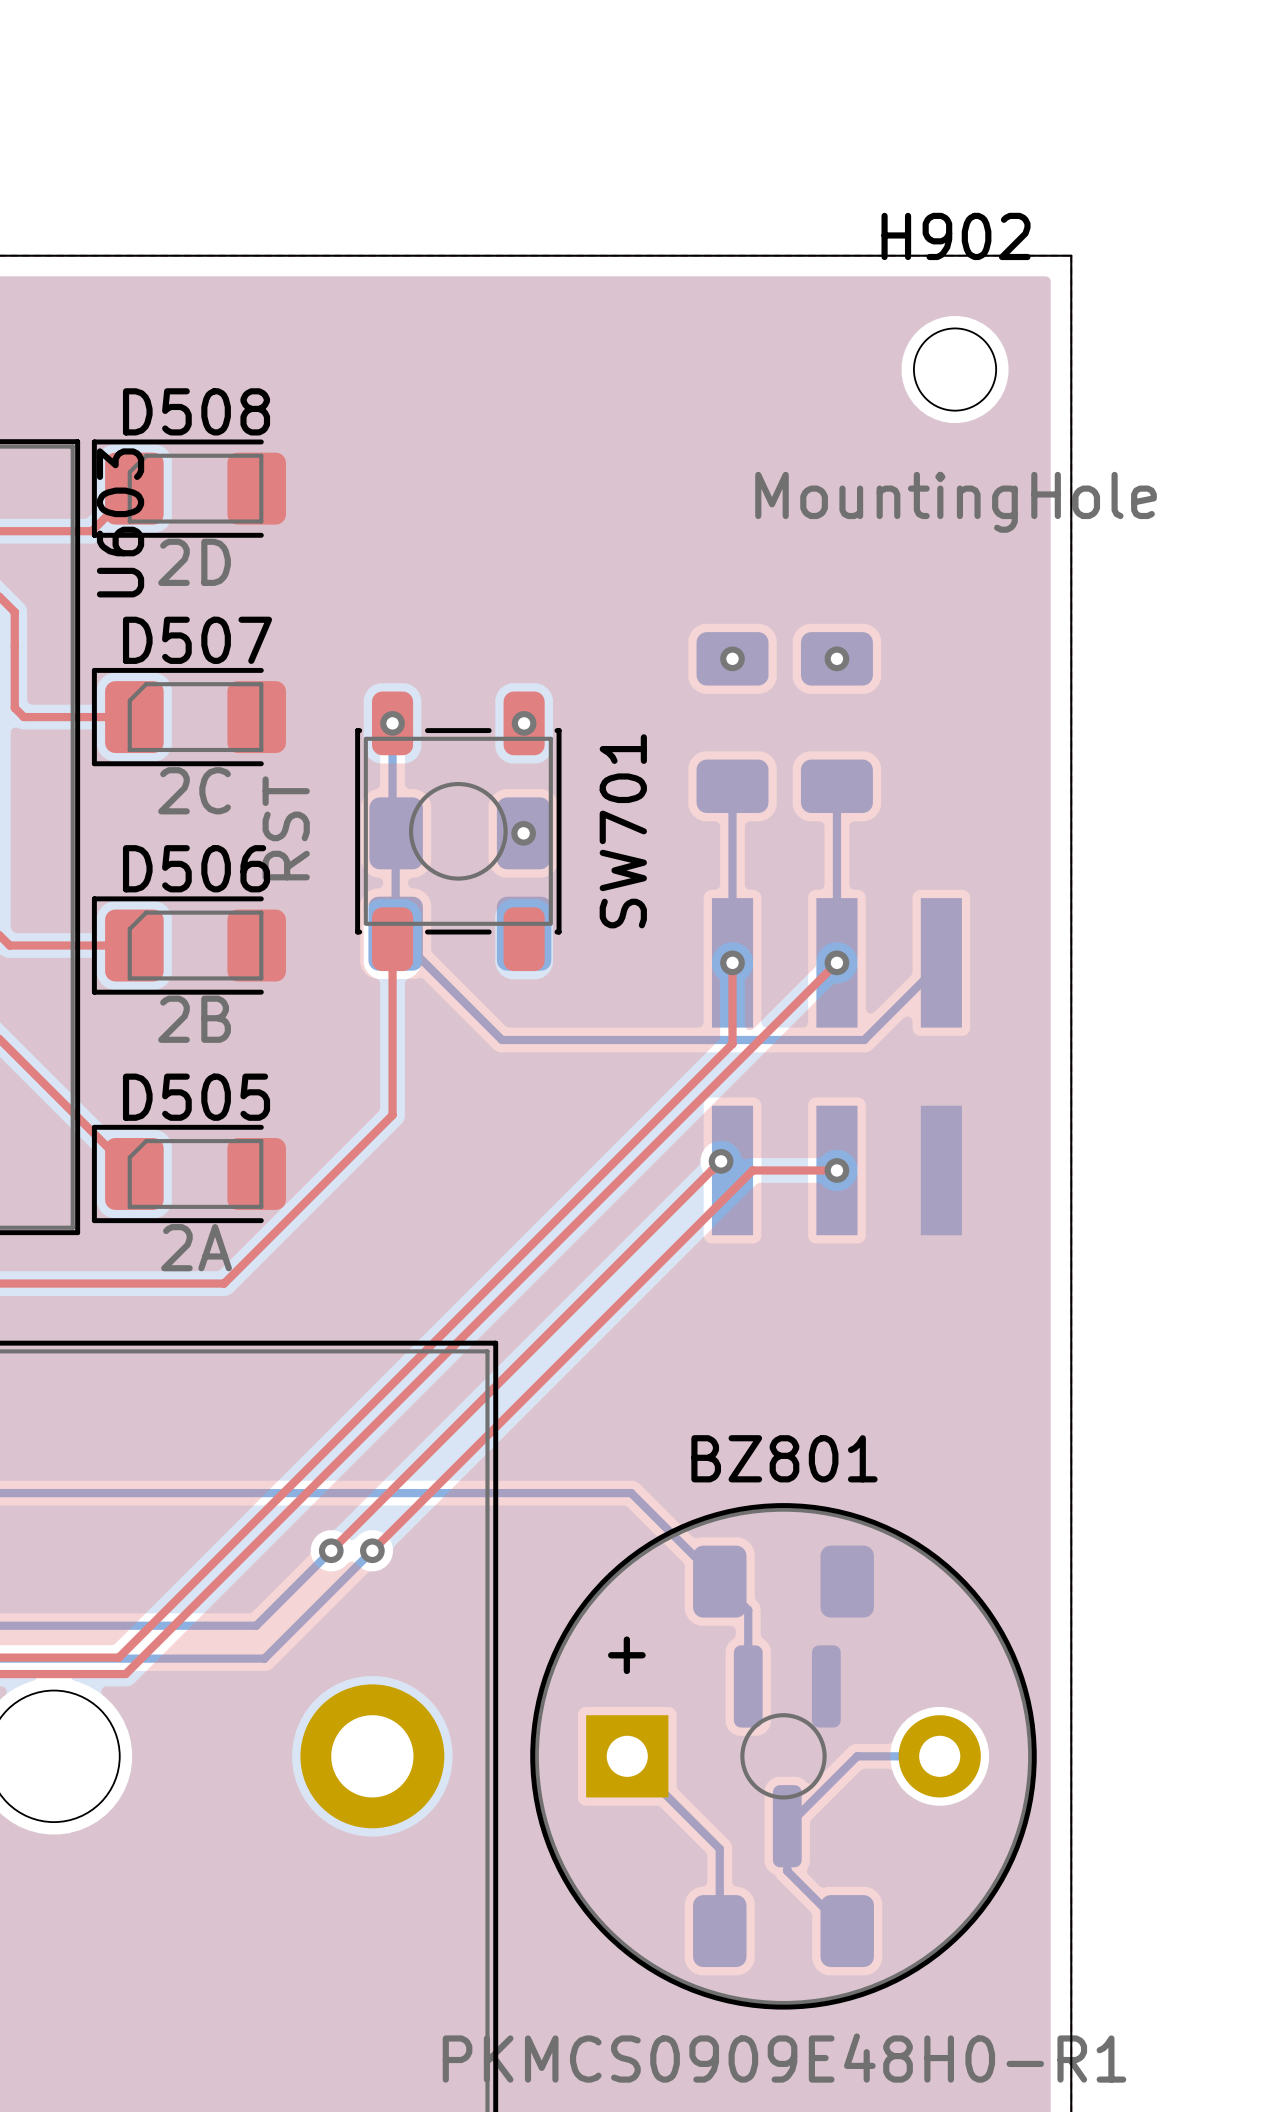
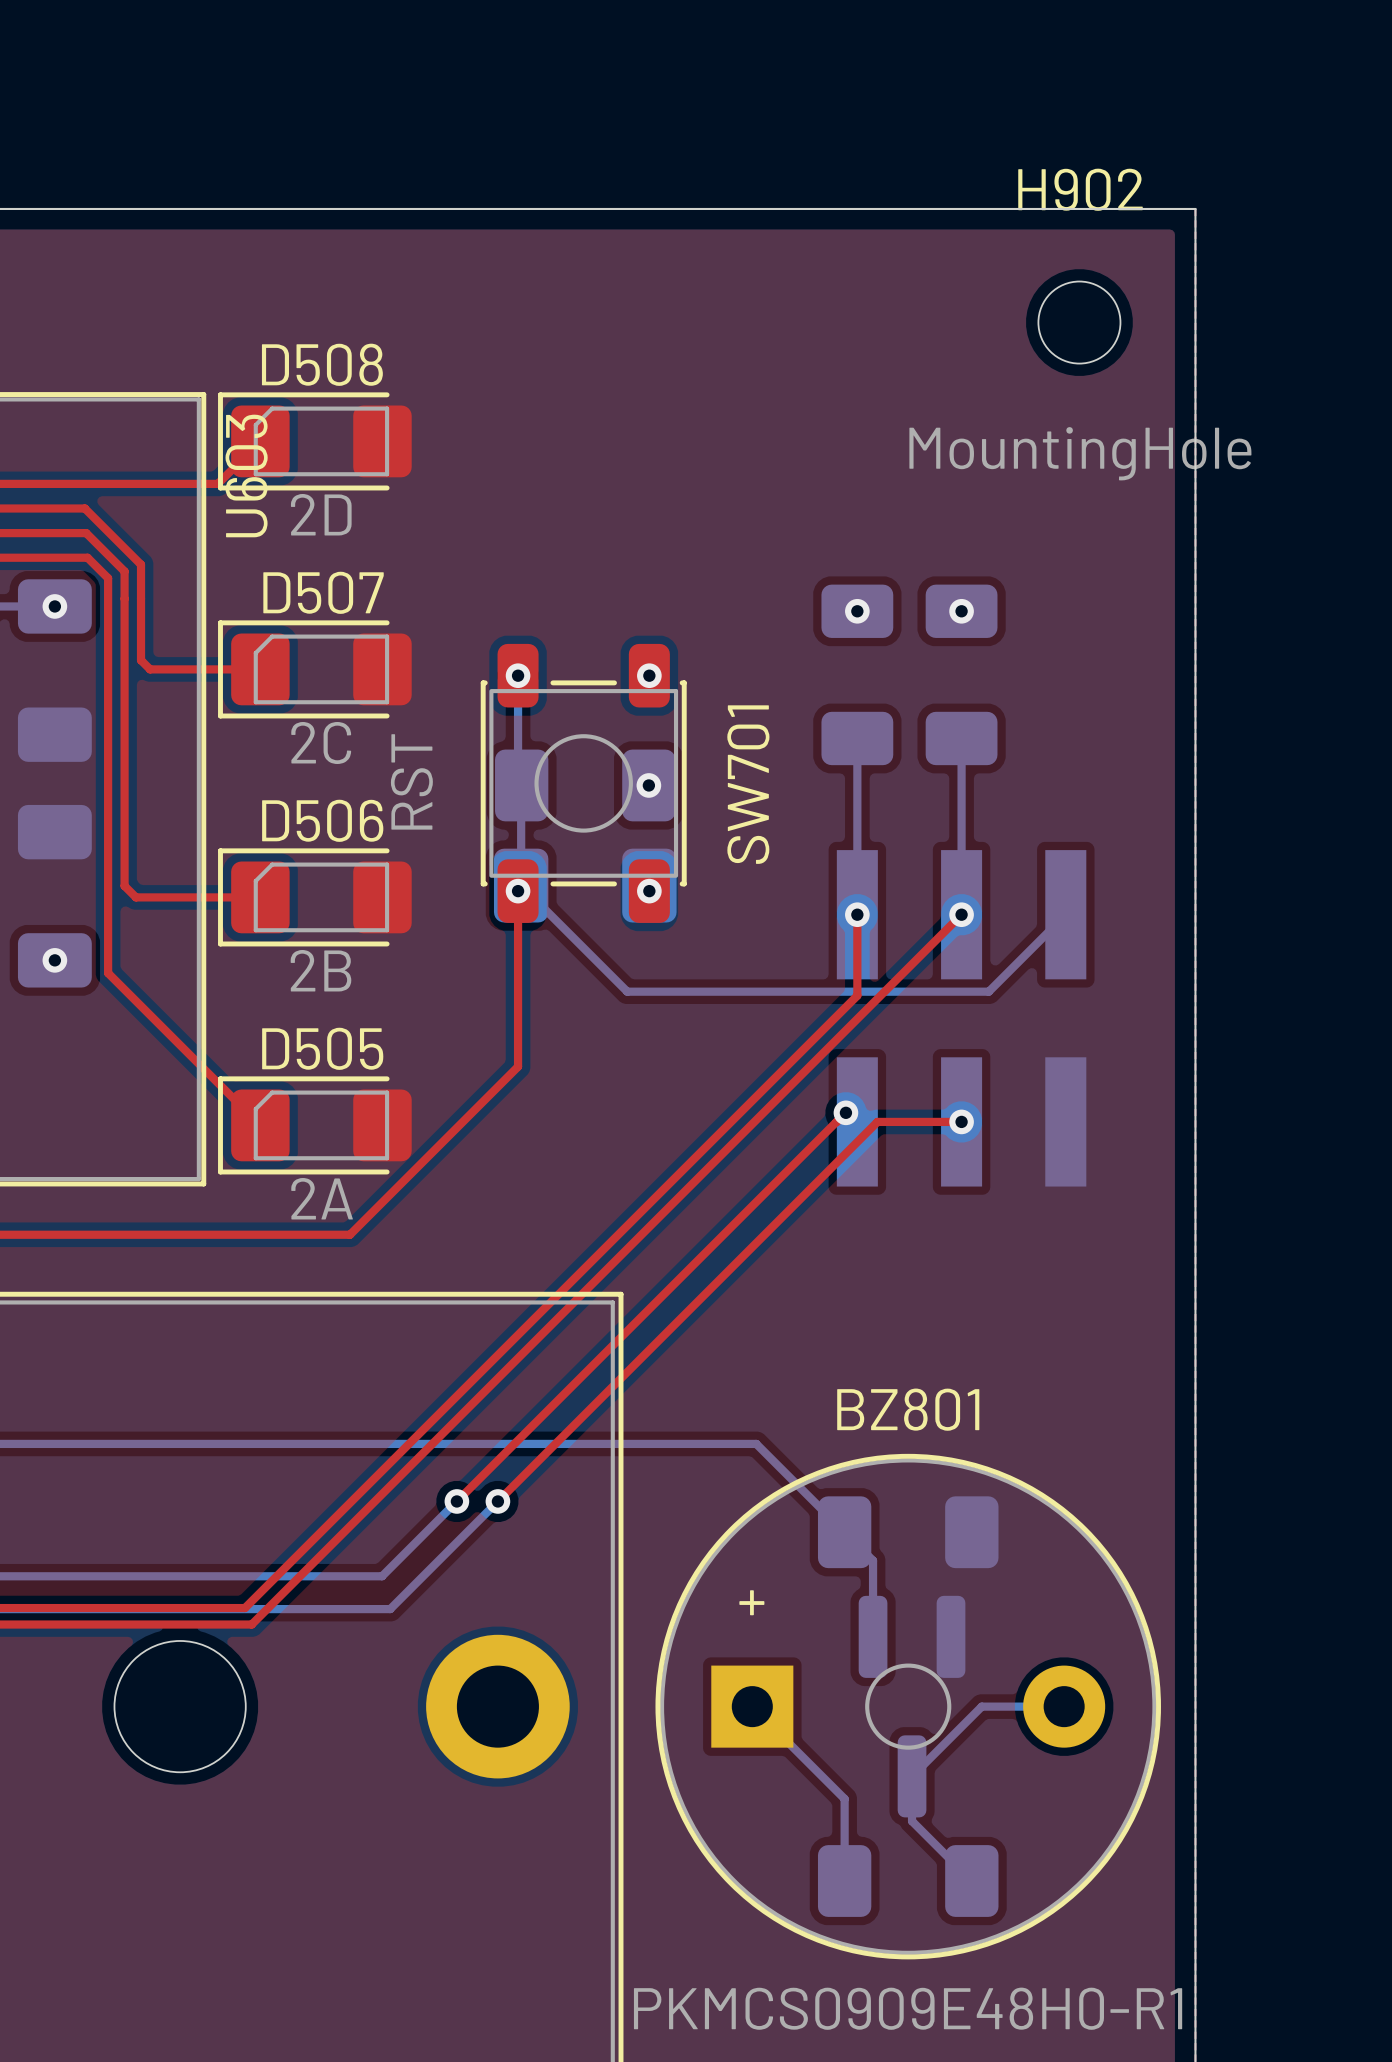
via: none -> (518, 891)
via: none -> (649, 891)

